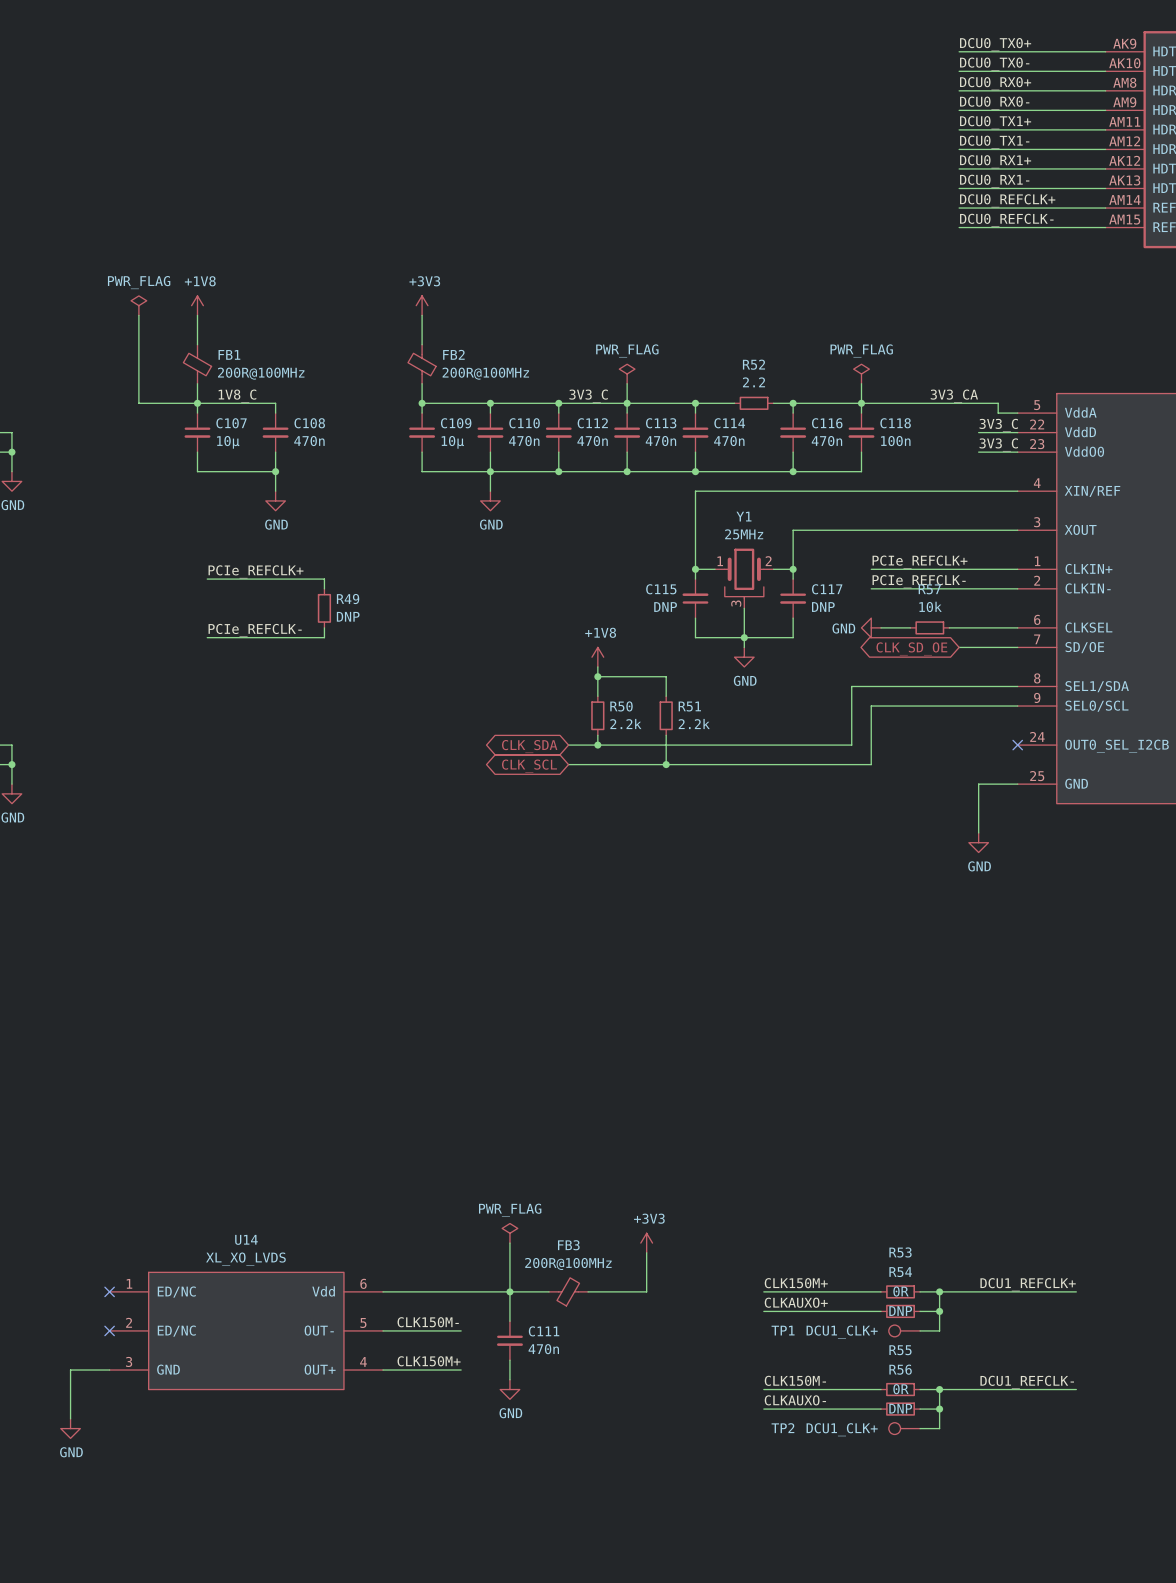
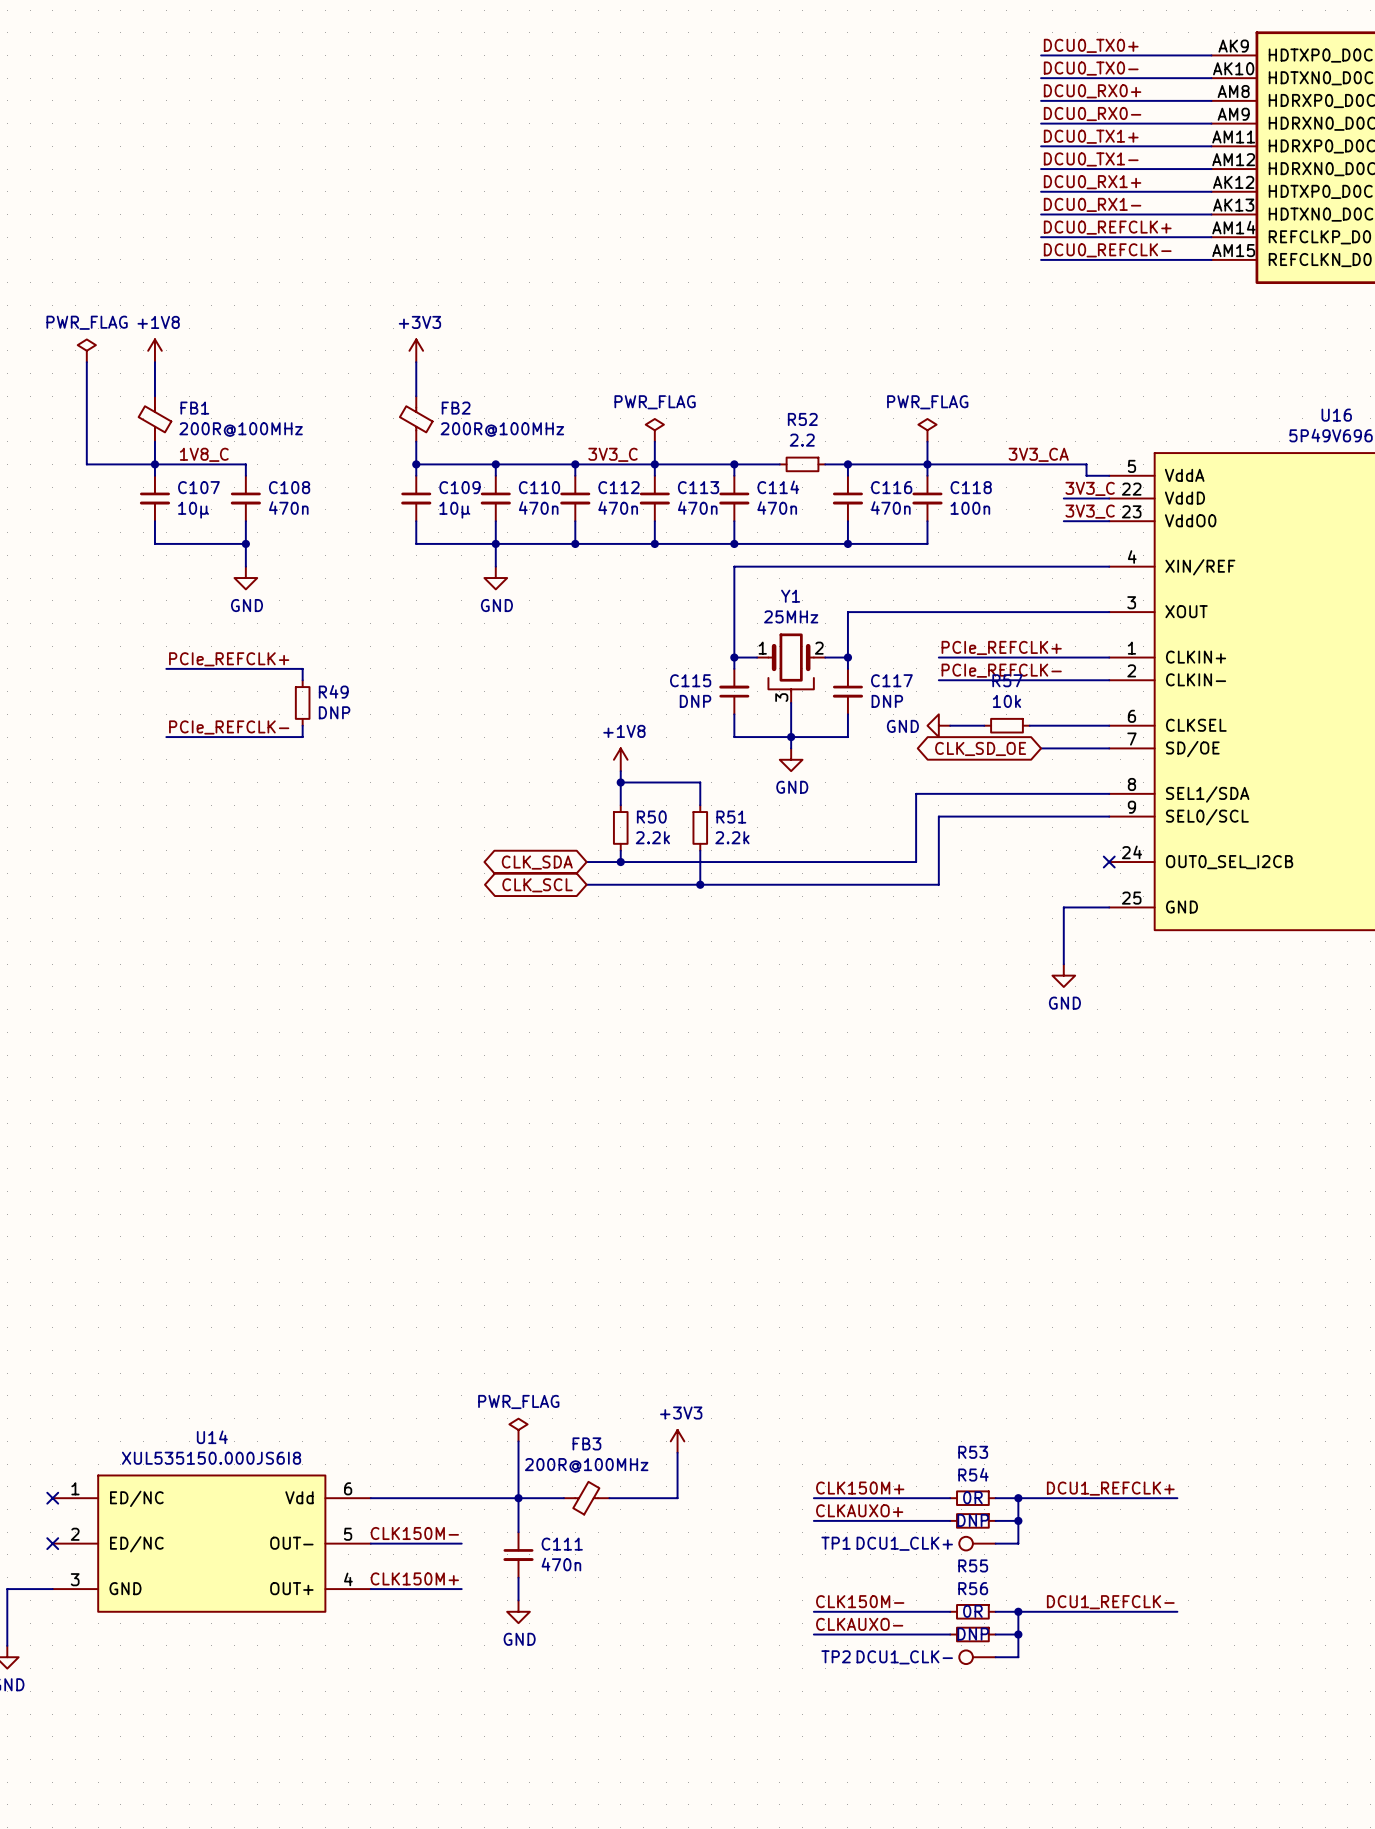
U14 value: XL_XO_LVDS (245, 1259) -> XUL535150.000JS6I8 (211, 1458)
TP2 value: DCU1_CLK+ (842, 1429) -> DCU1_CLK- (904, 1657)

